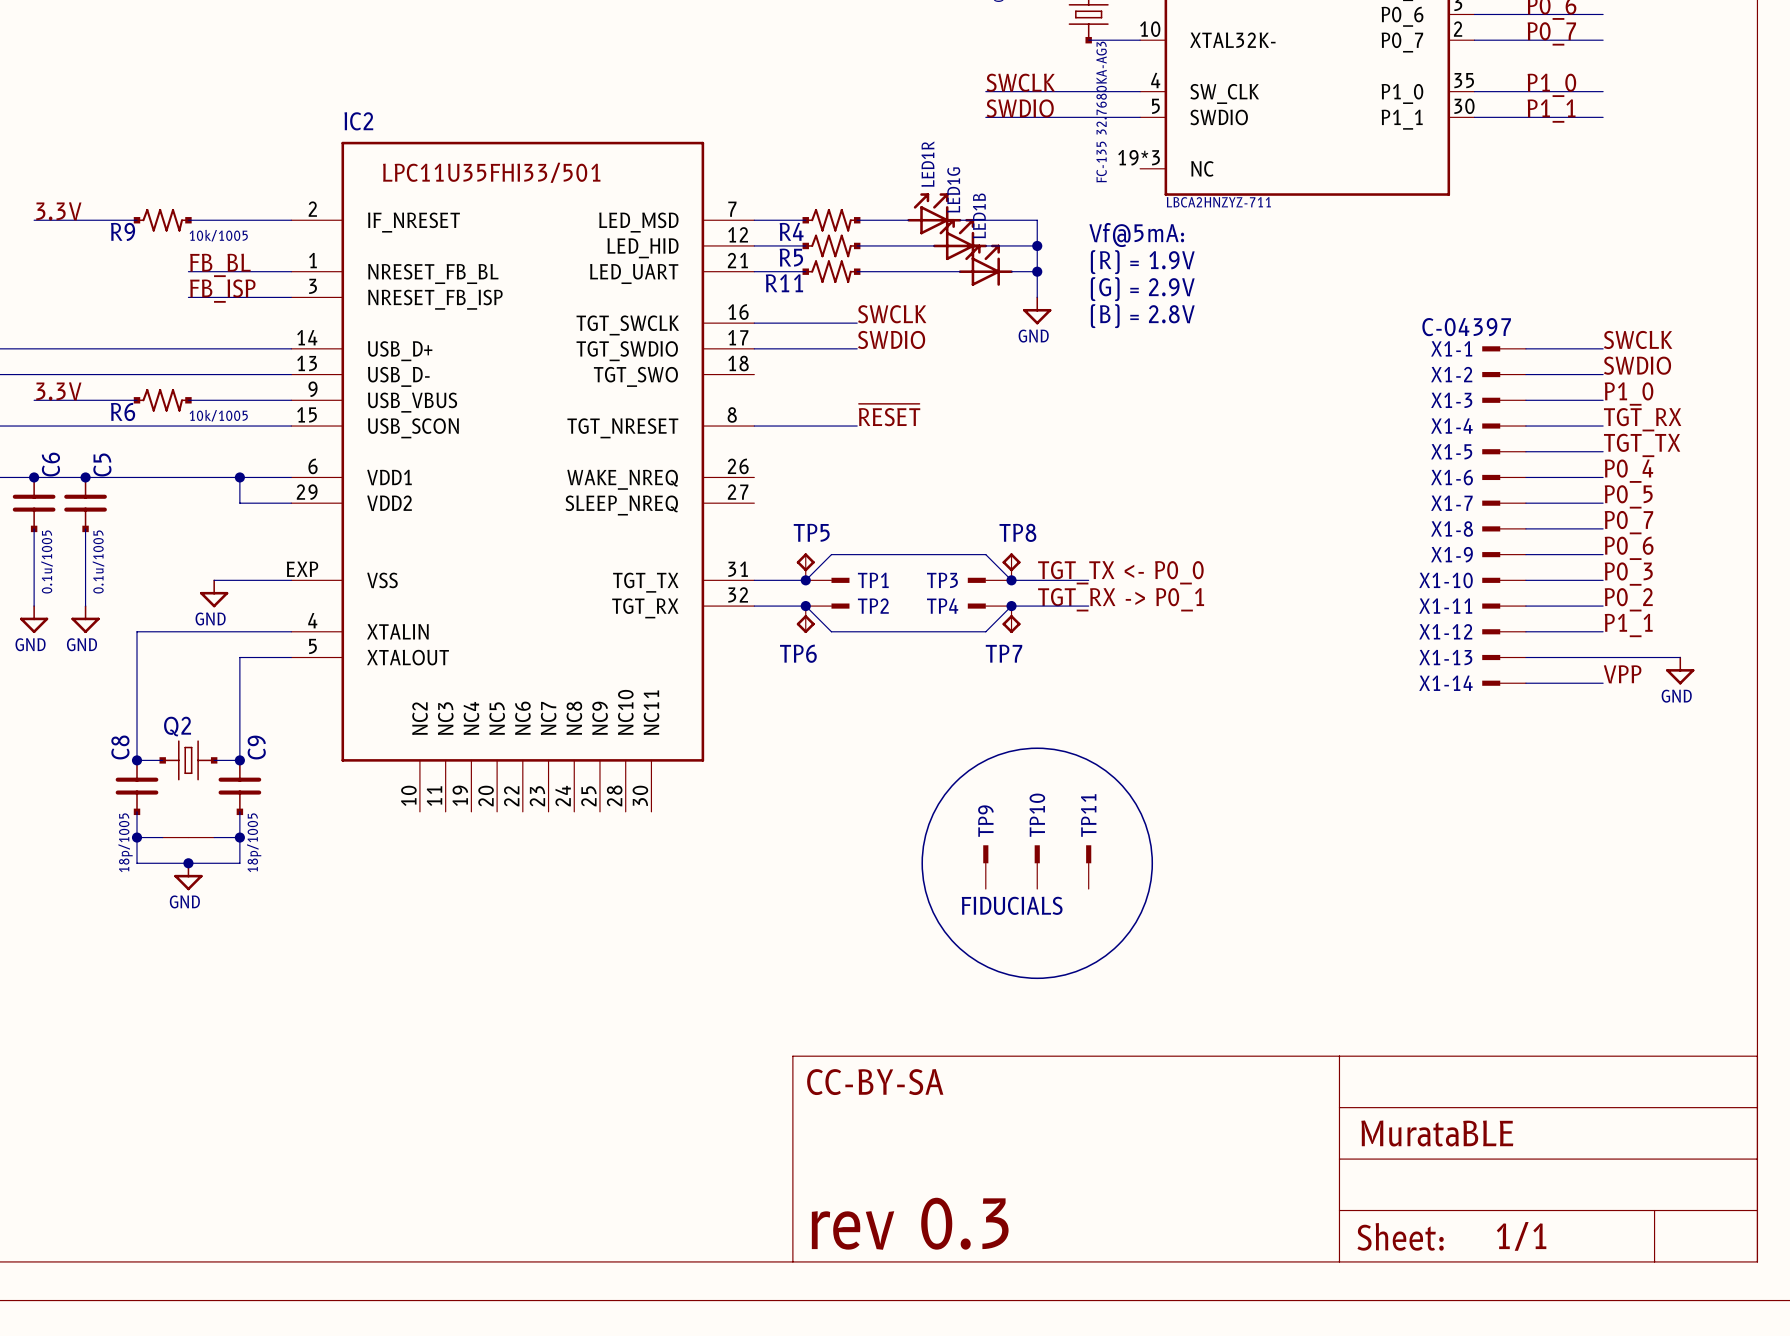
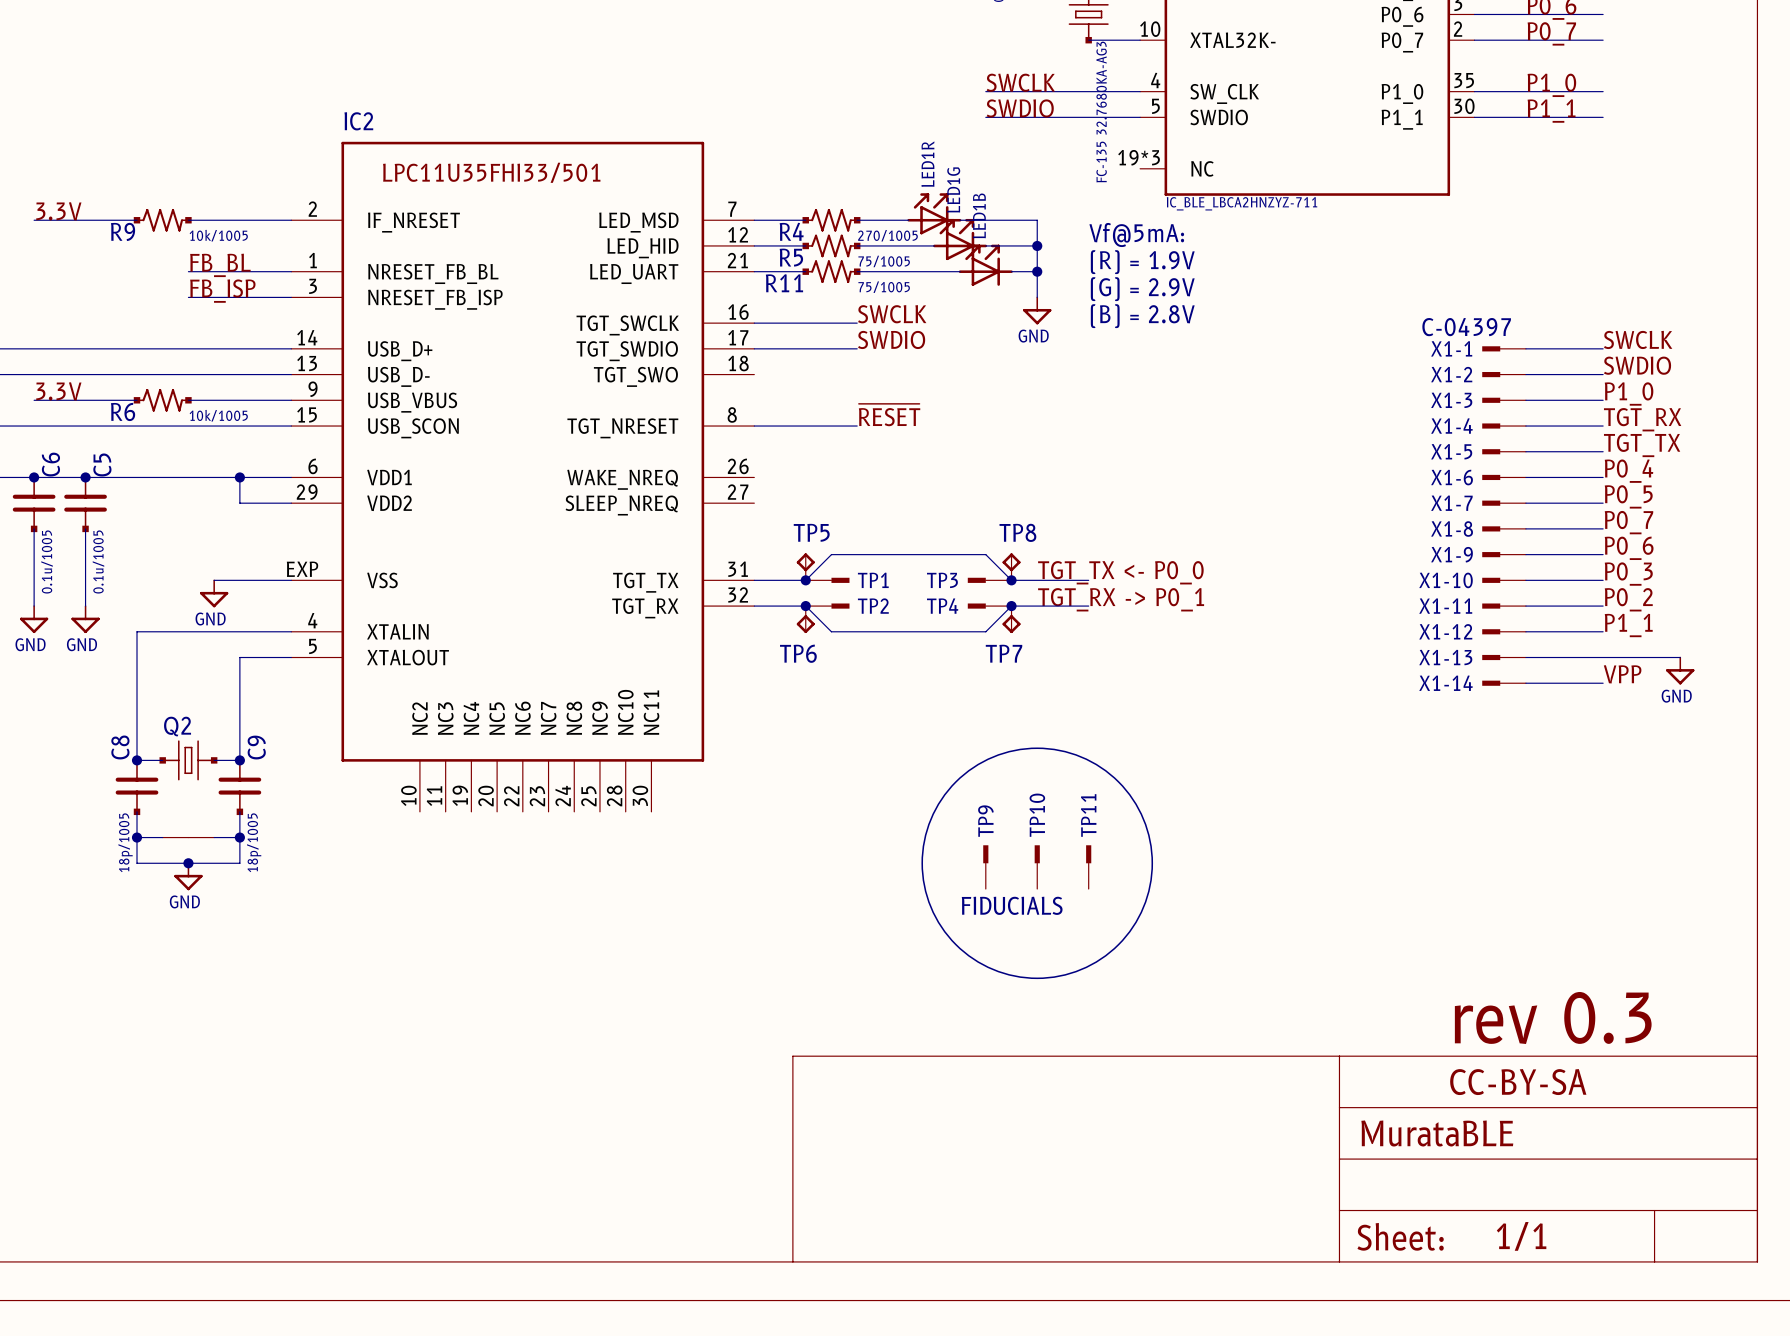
part value: LBCA2HNZYZ-711 (1218, 202) -> IC_BLE_LBCA2HNZYZ-711 (1242, 203)
R4 value: none -> 270/1005 (887, 235)
R5 value: none -> 75/1005 (884, 261)
R11 value: none -> 75/1005 (884, 287)
text: none -> rev 0.3 (1553, 1017)
text: CC-BY-SA (875, 1082) -> none
text: none -> CC-BY-SA (1518, 1082)
text: rev 0.3 (910, 1223) -> none

